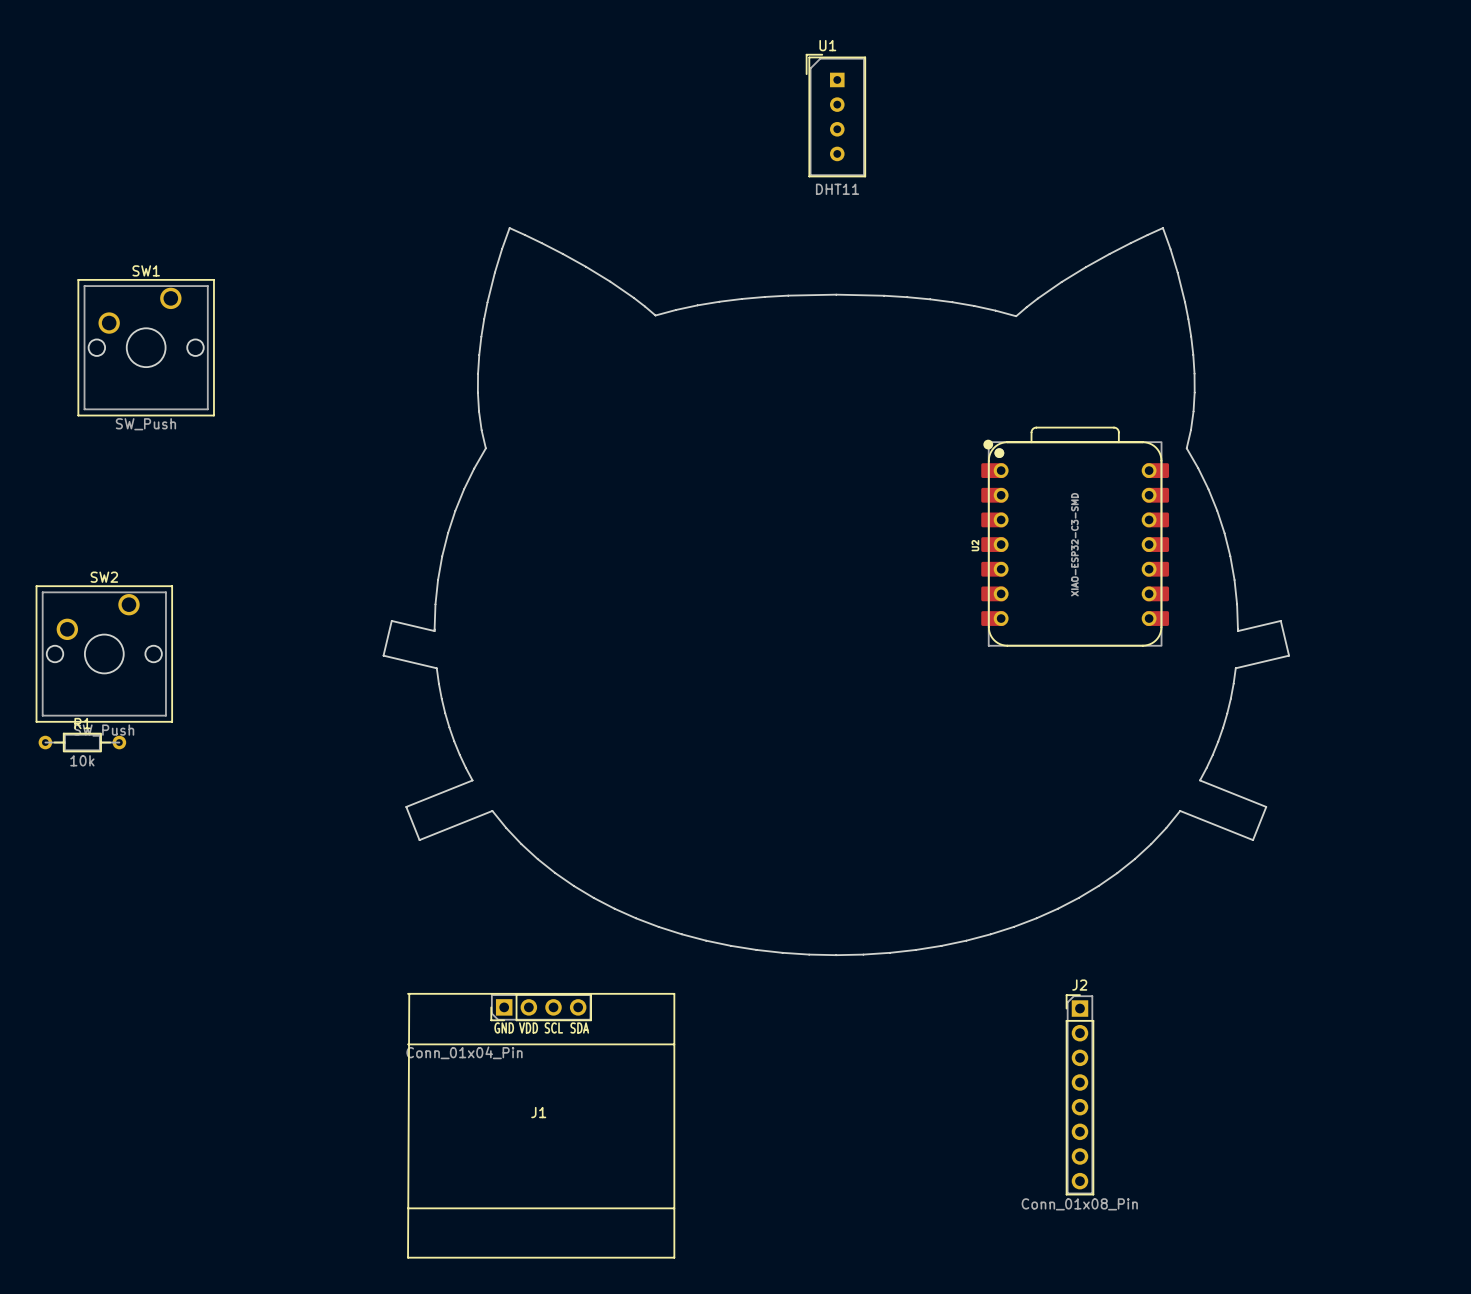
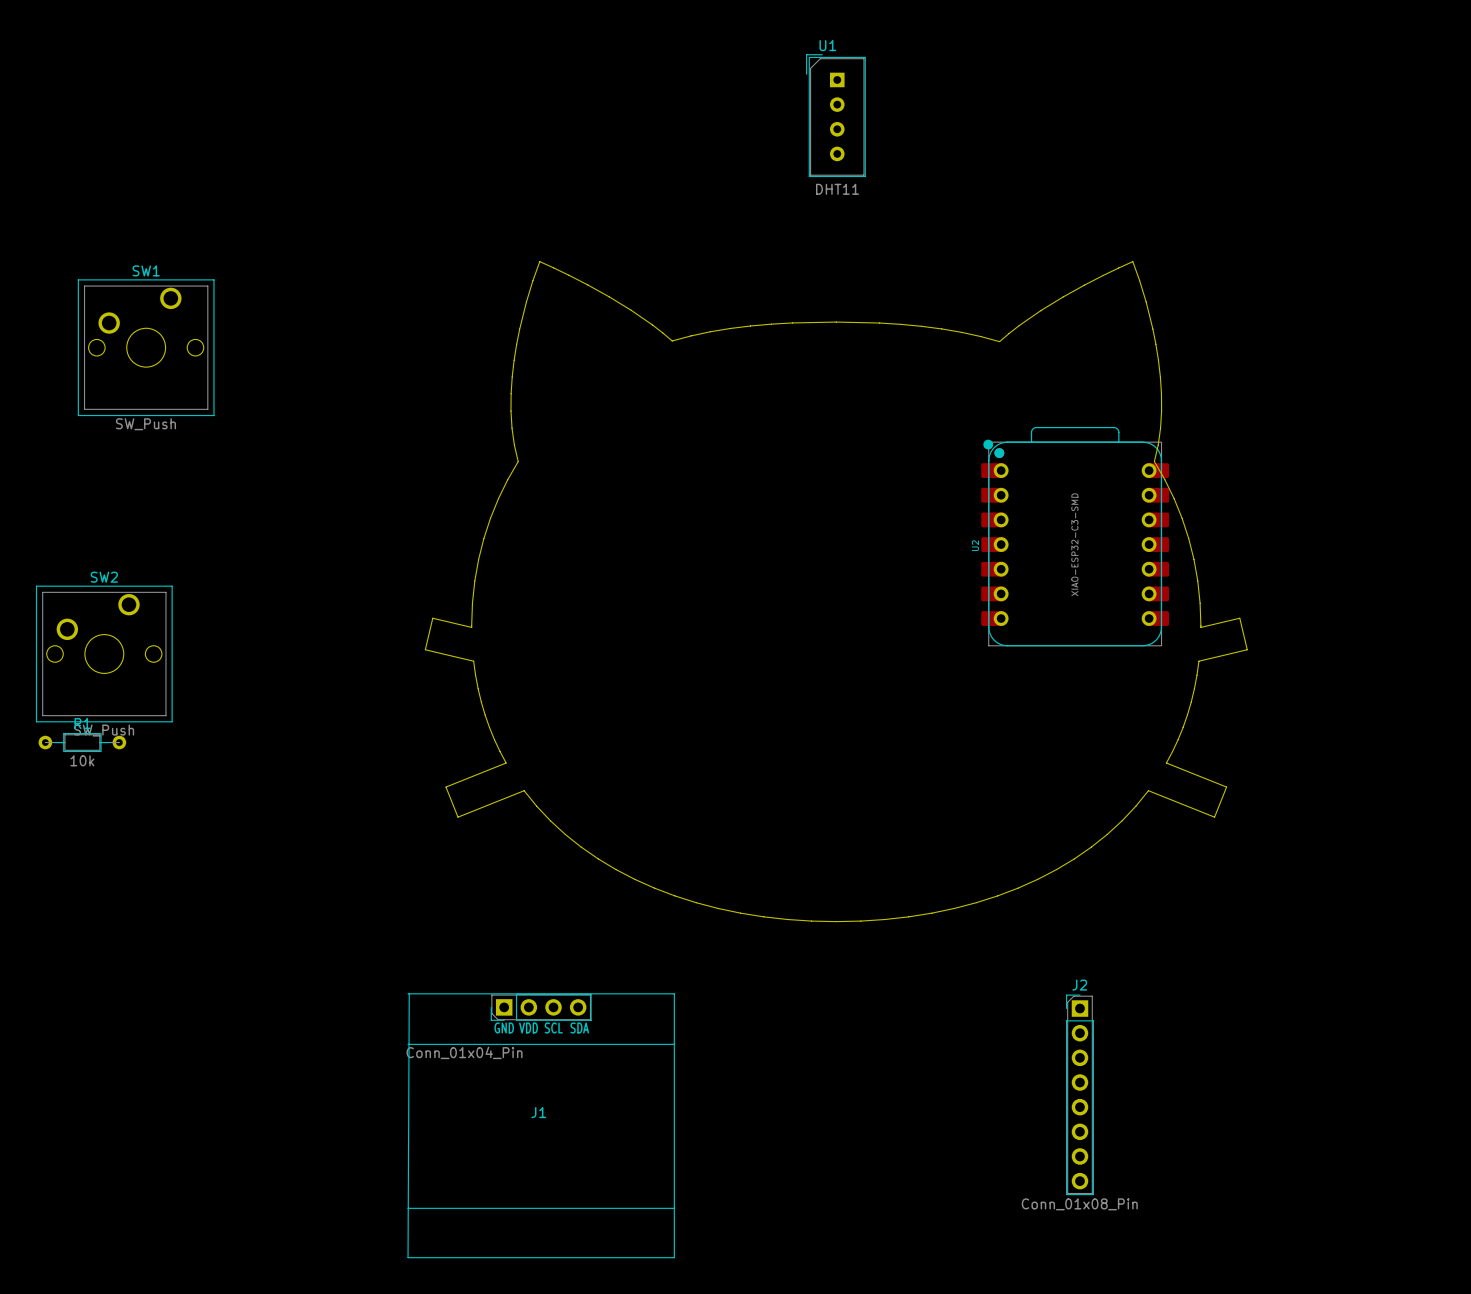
board edge: (509, 228) (487, 302) (479, 355) (479, 411) (485, 448) (464, 489) (448, 533) (438, 580) (434, 631) (391, 620) (383, 655) (436, 668) (441, 698) (449, 727) (472, 780) (406, 806) (419, 840) (492, 810) (521, 844) (555, 873) (593, 897) (636, 918) (681, 934) (730, 945) (782, 952) (836, 955) (890, 952) (941, 945) (990, 934) (1036, 918) (1078, 897) (1117, 873) (1151, 844) (1180, 810) (1253, 840) (1266, 806) (1200, 780) (1223, 727) (1230, 698) (1235, 668) (1289, 655) (1280, 620) (1237, 631) (1234, 580) (1224, 533) (1208, 489) (1186, 448) (1193, 411) (1193, 354) (1185, 302) (1162, 228) (1086, 267) (1037, 298) (1016, 316) (974, 305) (930, 299) (836, 294) (741, 298) (697, 305) (655, 315) (633, 297) (585, 266) (509, 228) -> (539, 261) (519, 329) (512, 376) (512, 428) (518, 461) (498, 498) (483, 538) (474, 581) (471, 627) (432, 618) (425, 649) (473, 661) (485, 715) (506, 763) (445, 787) (458, 817) (524, 790) (550, 820) (581, 847) (616, 869) (654, 888) (696, 902) (740, 913) (787, 919) (836, 921) (885, 919) (931, 913) (976, 902) (1018, 888) (1056, 869) (1091, 847) (1122, 820) (1148, 790) (1214, 817) (1226, 787) (1166, 763) (1187, 715) (1198, 661) (1247, 649) (1239, 618) (1200, 627) (1197, 581) (1188, 538) (1174, 498) (1154, 461) (1160, 428) (1160, 376) (1152, 329) (1132, 261) (1062, 297) (1019, 325) (999, 341) (961, 332) (921, 326) (836, 322) (750, 325) (710, 331) (672, 340) (652, 325) (609, 296) (539, 261)

